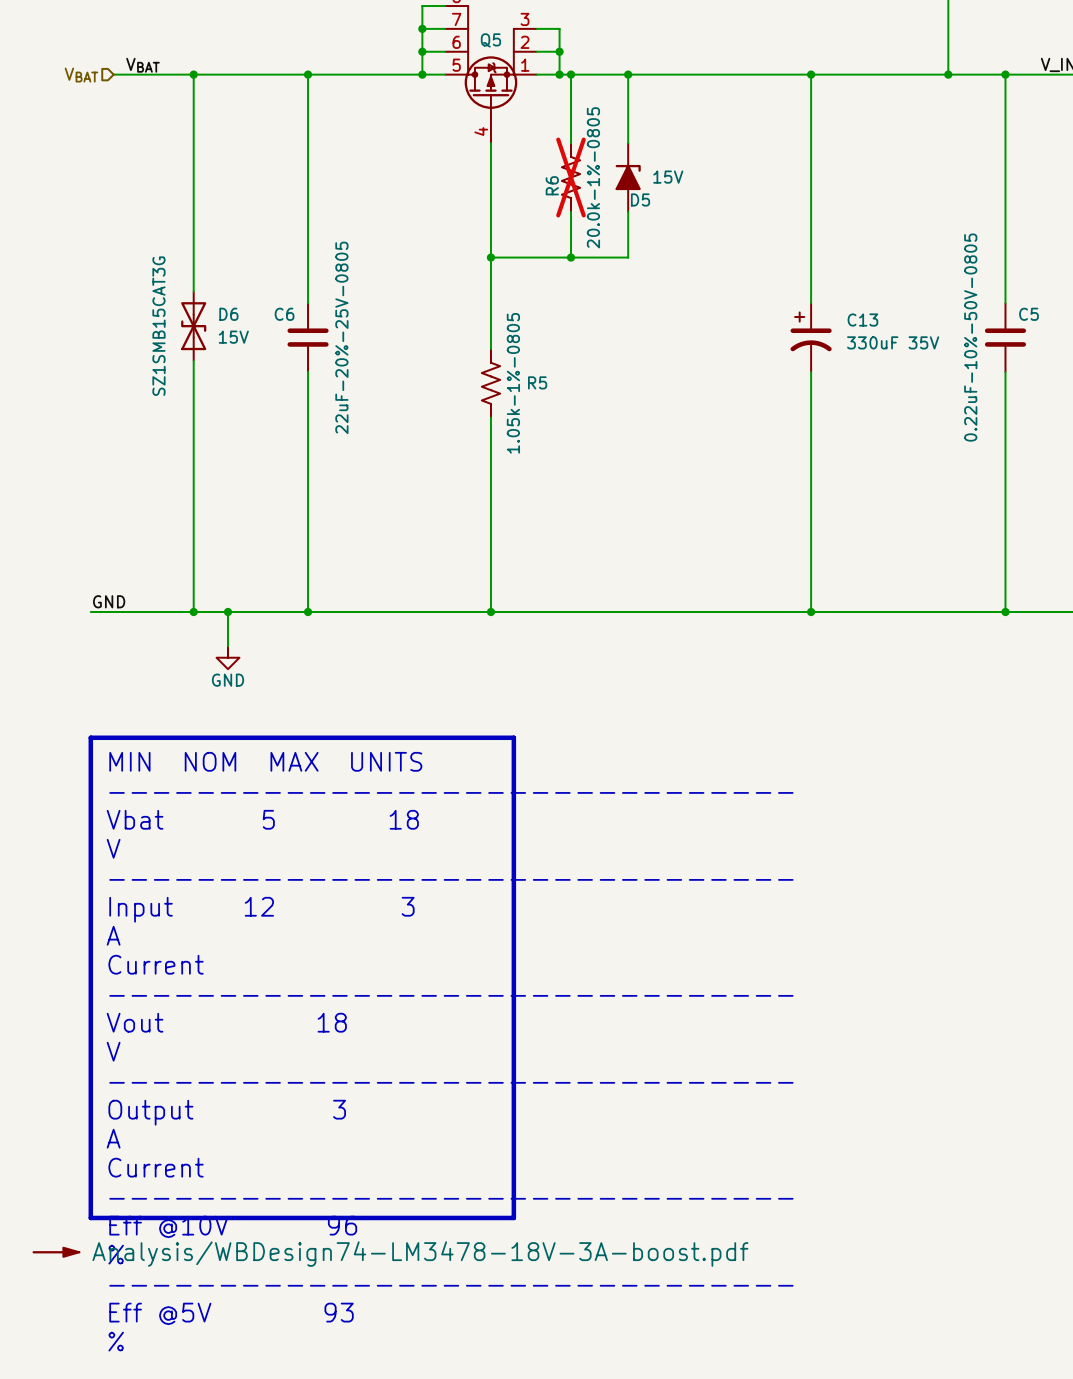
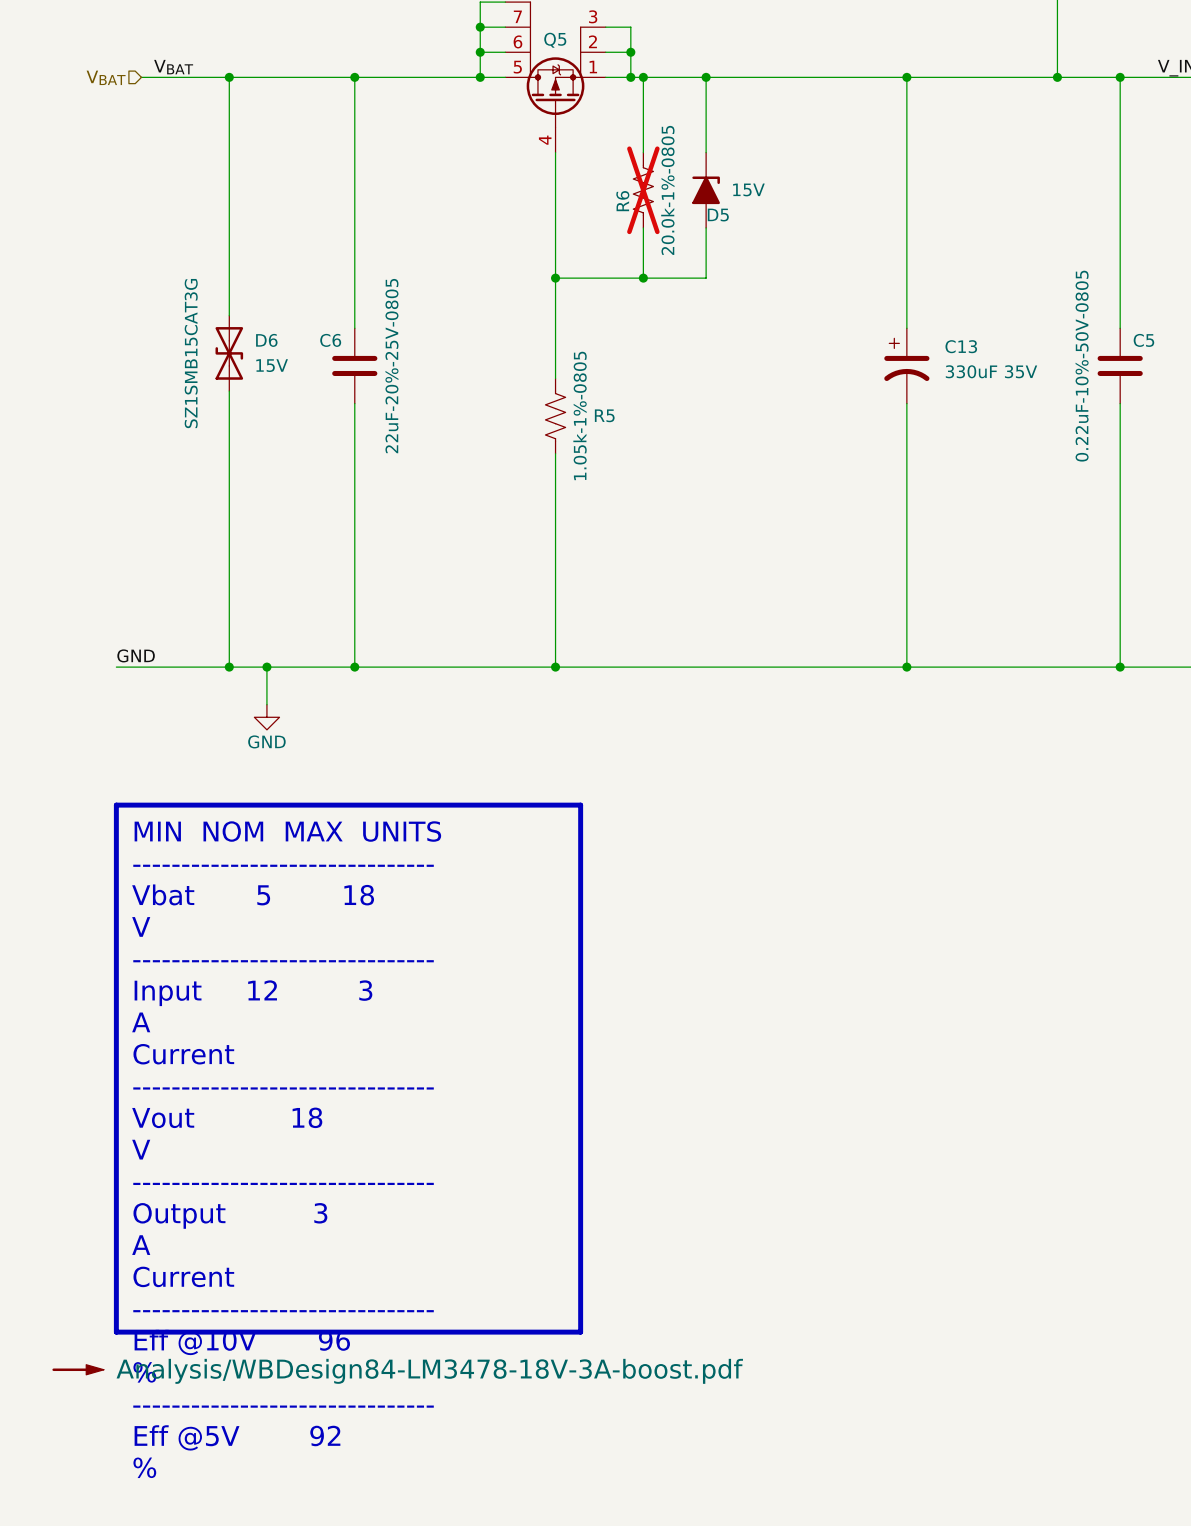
power symbol text: Analysis/WBDesign74-LM3478-18V-3A-boost.pdf (420, 1254) -> Analysis/WBDesign84-LM3478-18V-3A-boost.pdf (429, 1371)
text: Eff @5V 93 (231, 1313) -> Eff @5V 92 (237, 1437)

